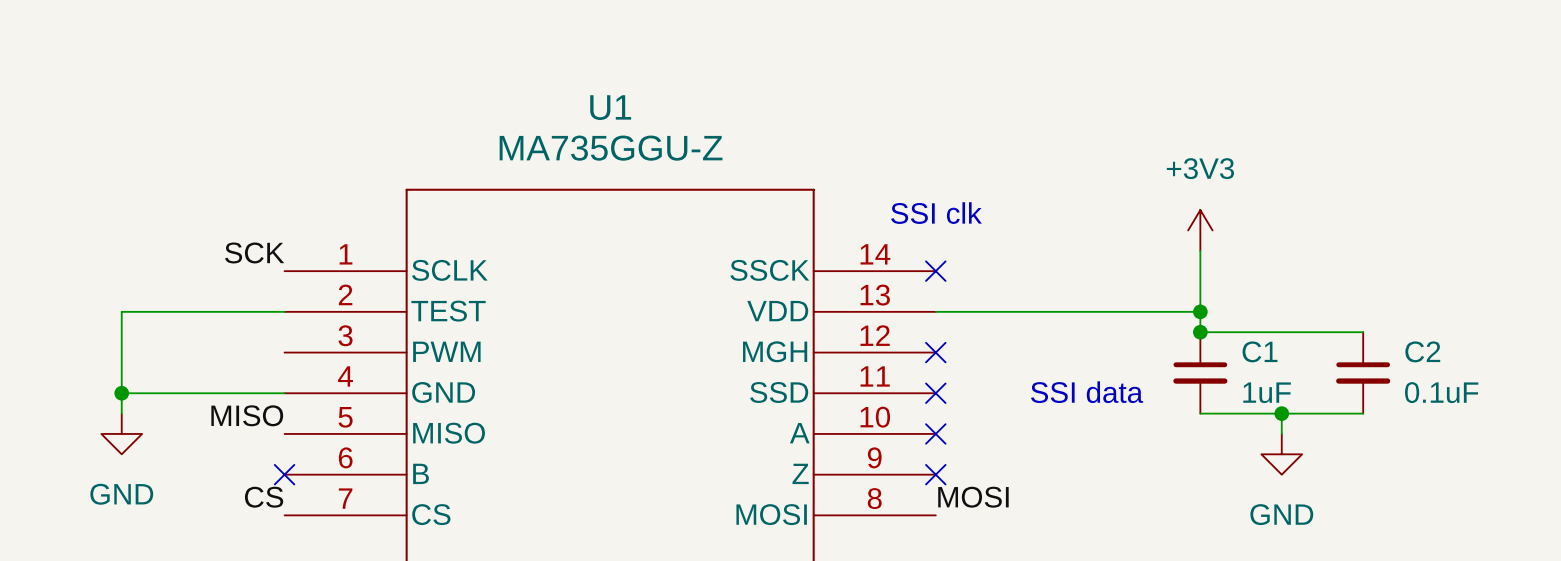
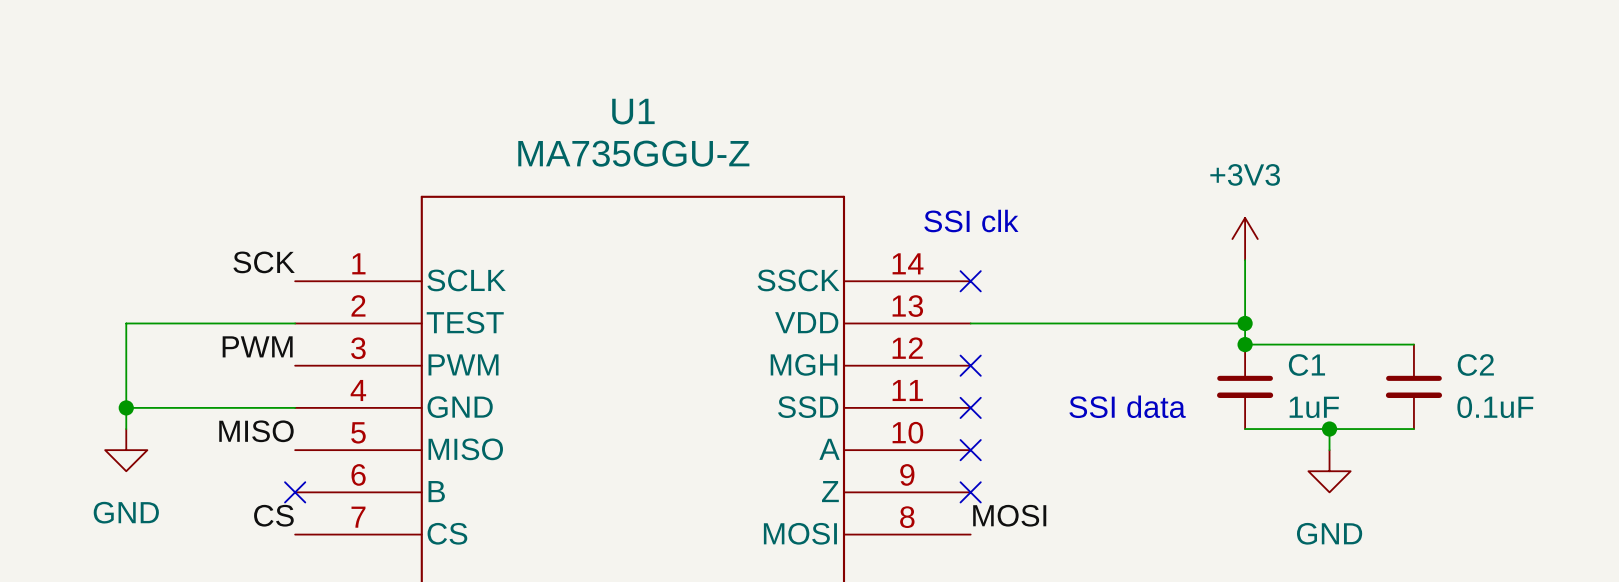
label: none -> PWM (257, 346)

